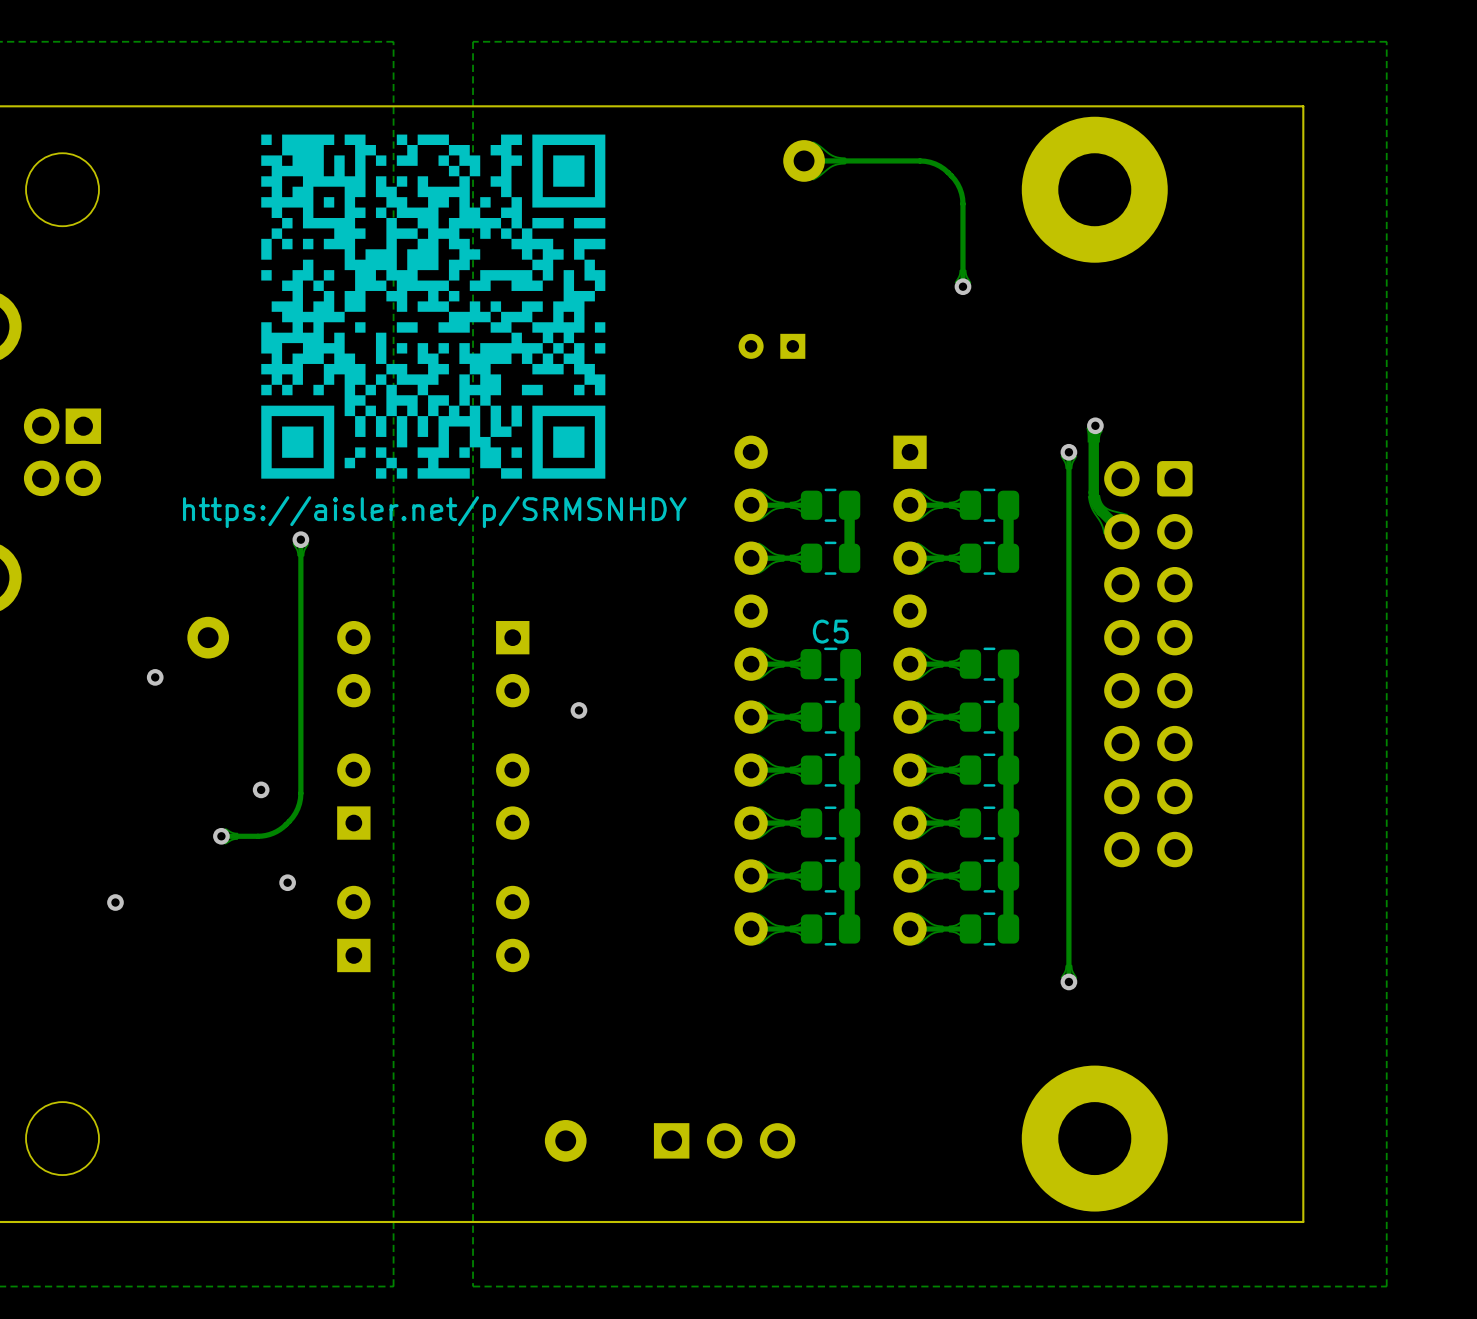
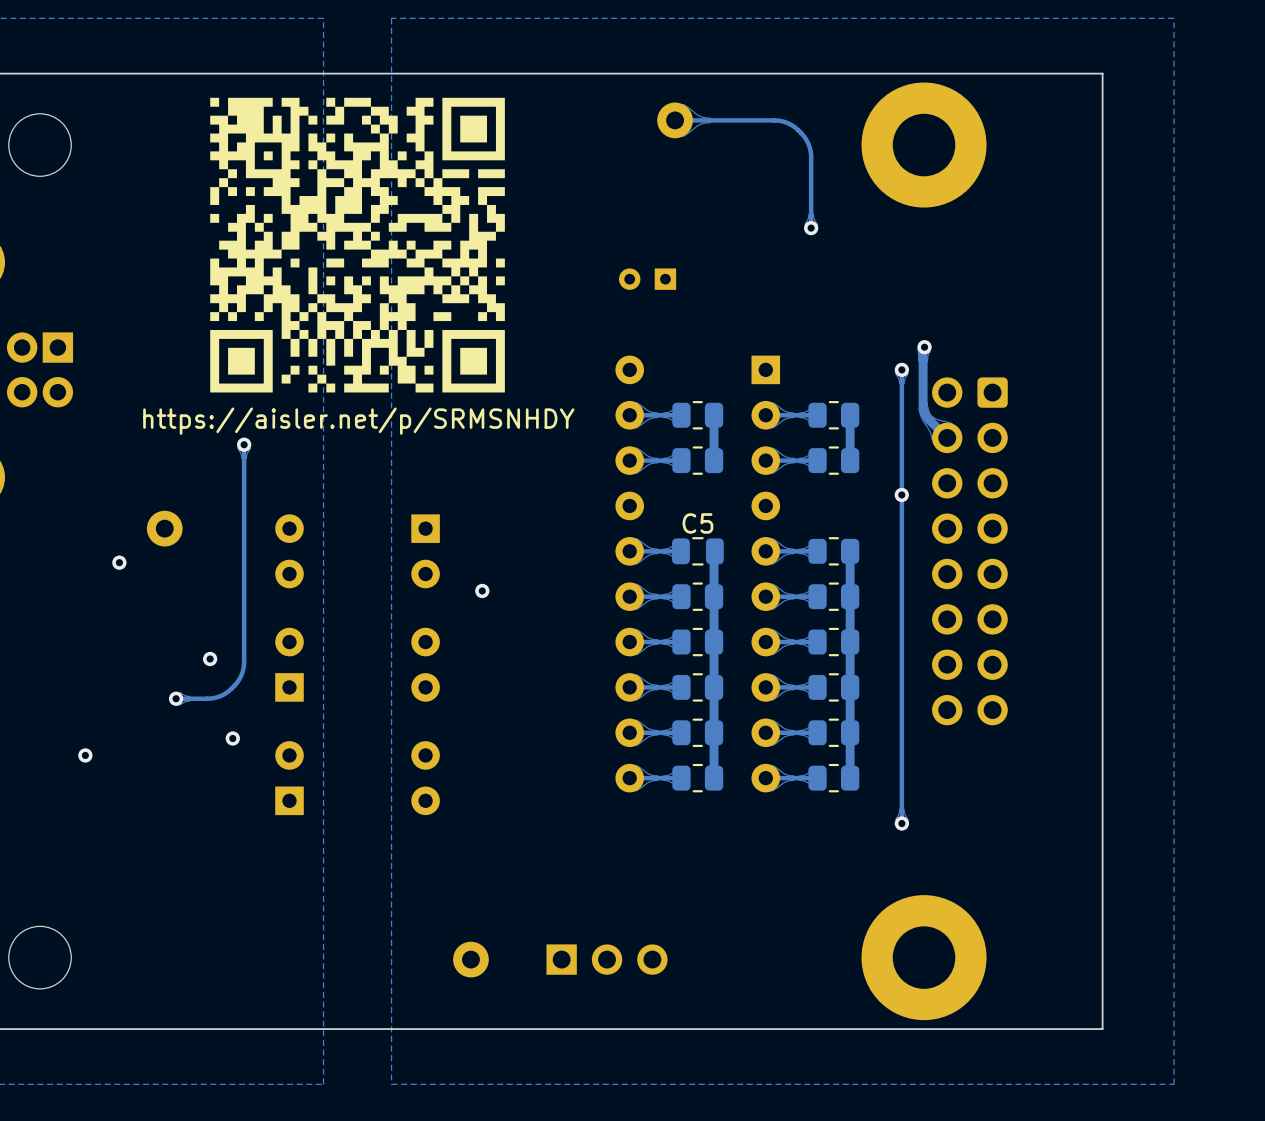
via: none -> (901, 494)

